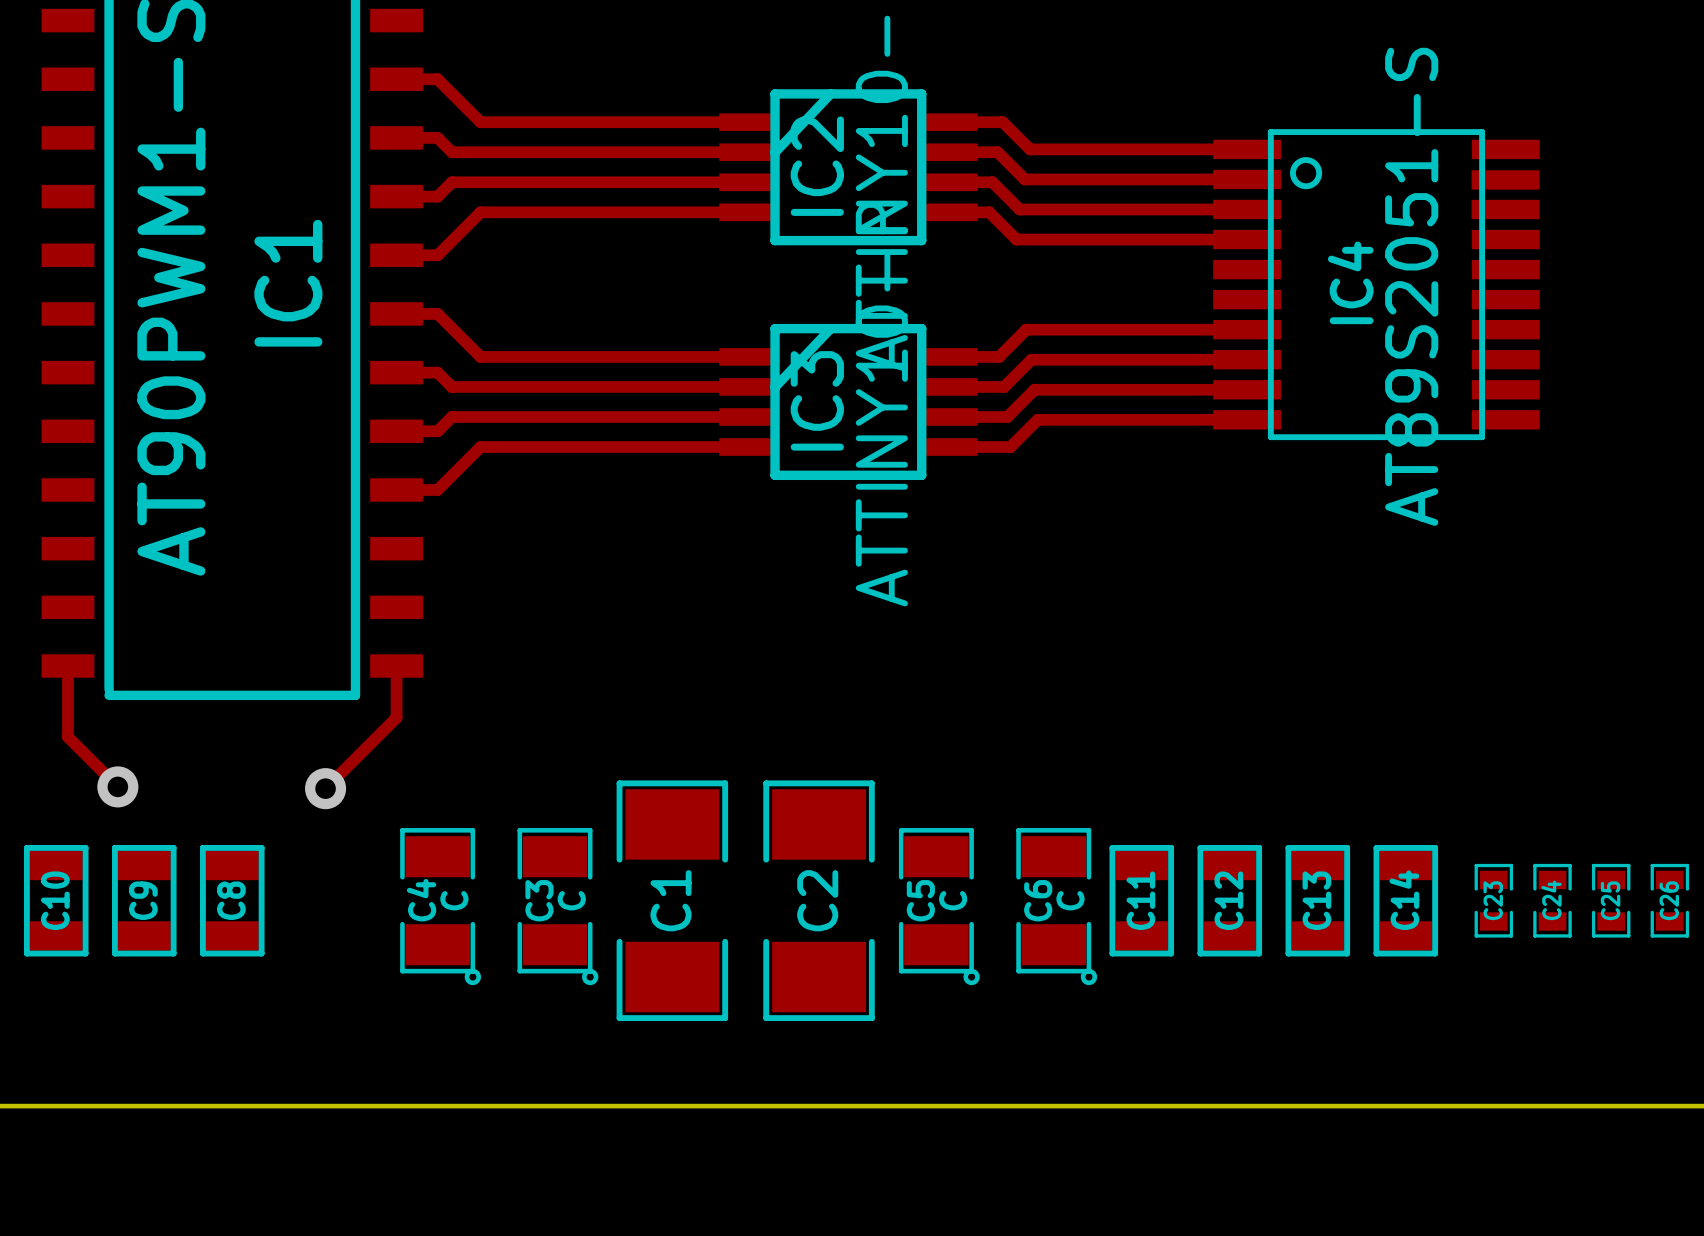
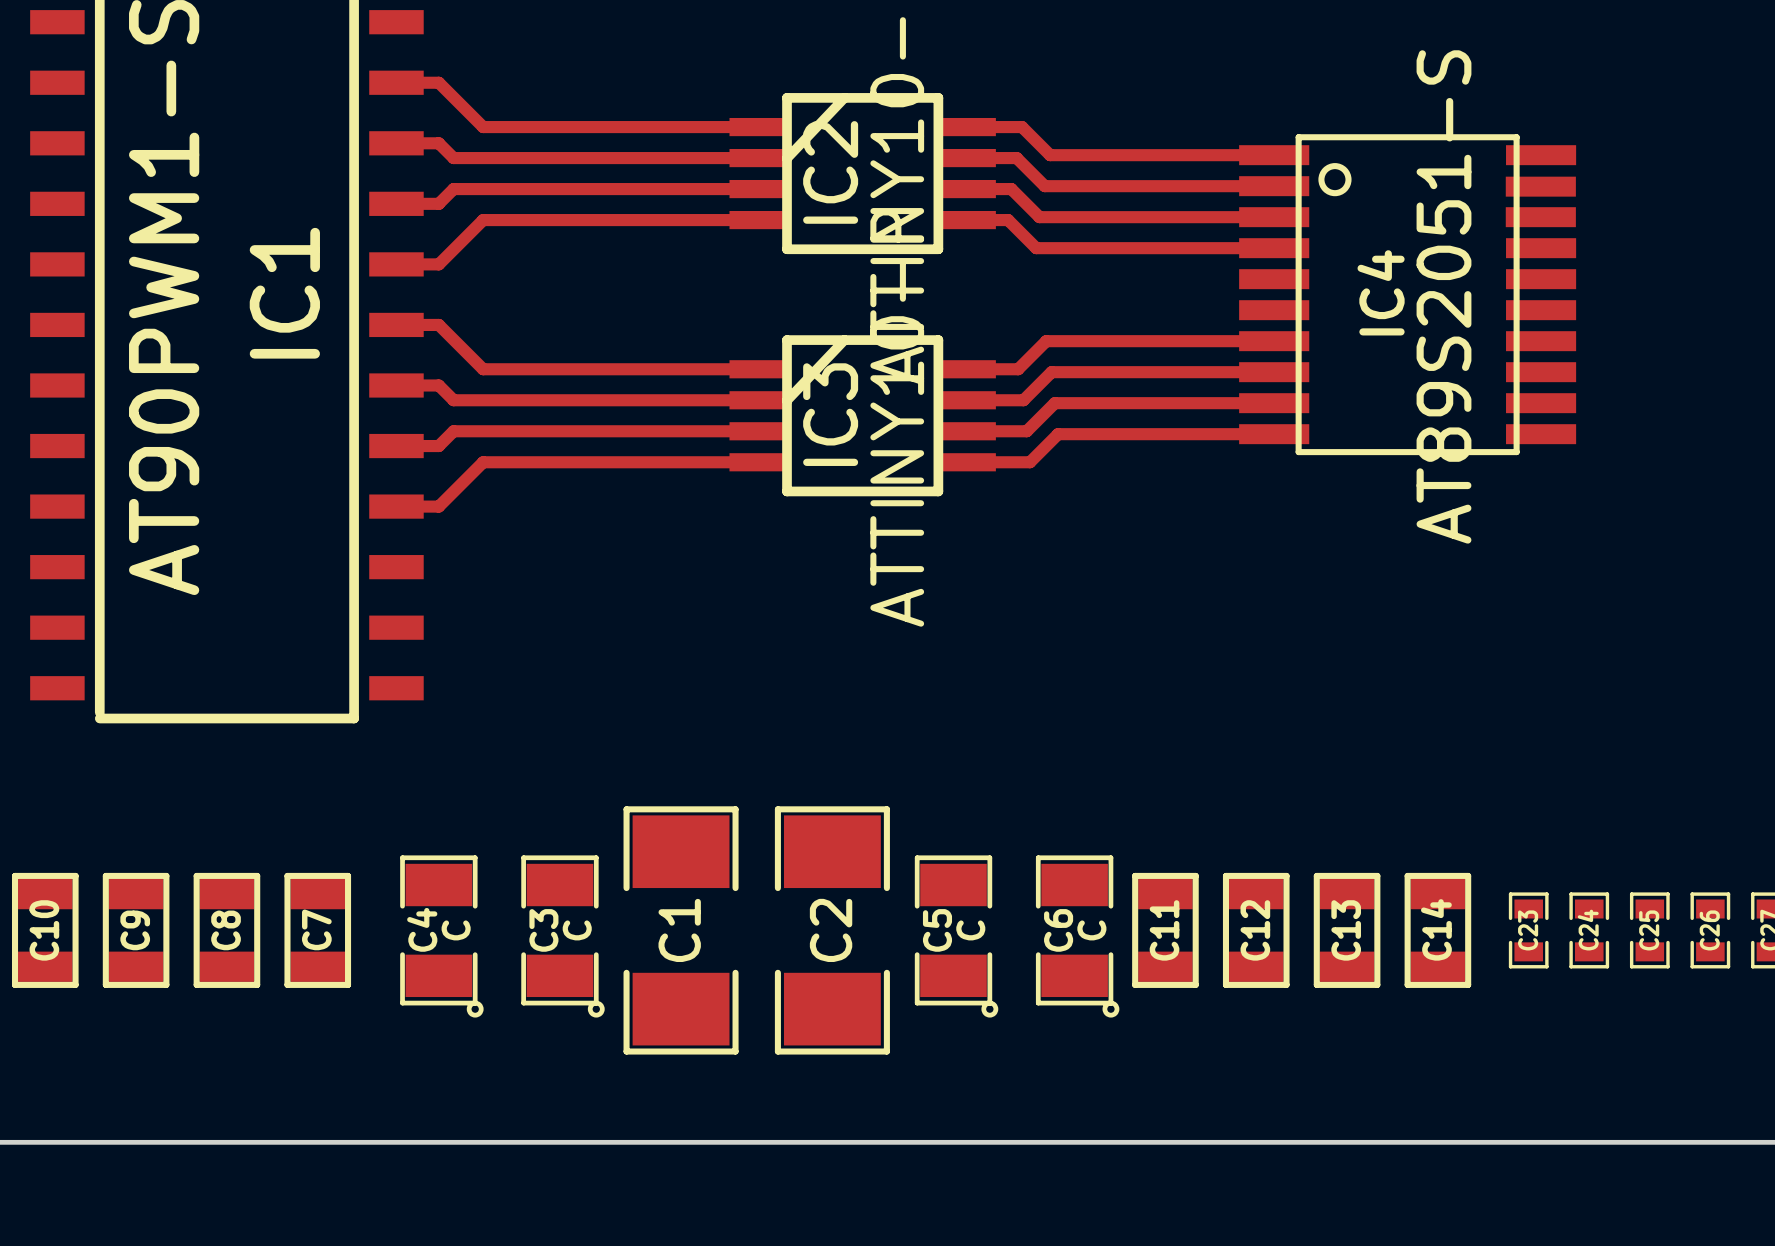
track: (67, 666) (67, 737) (117, 786) -> none
track: (396, 666) (396, 717) (325, 788) -> none
via: (117, 786) -> none
via: (325, 788) -> none
C7: none -> (317, 930)

